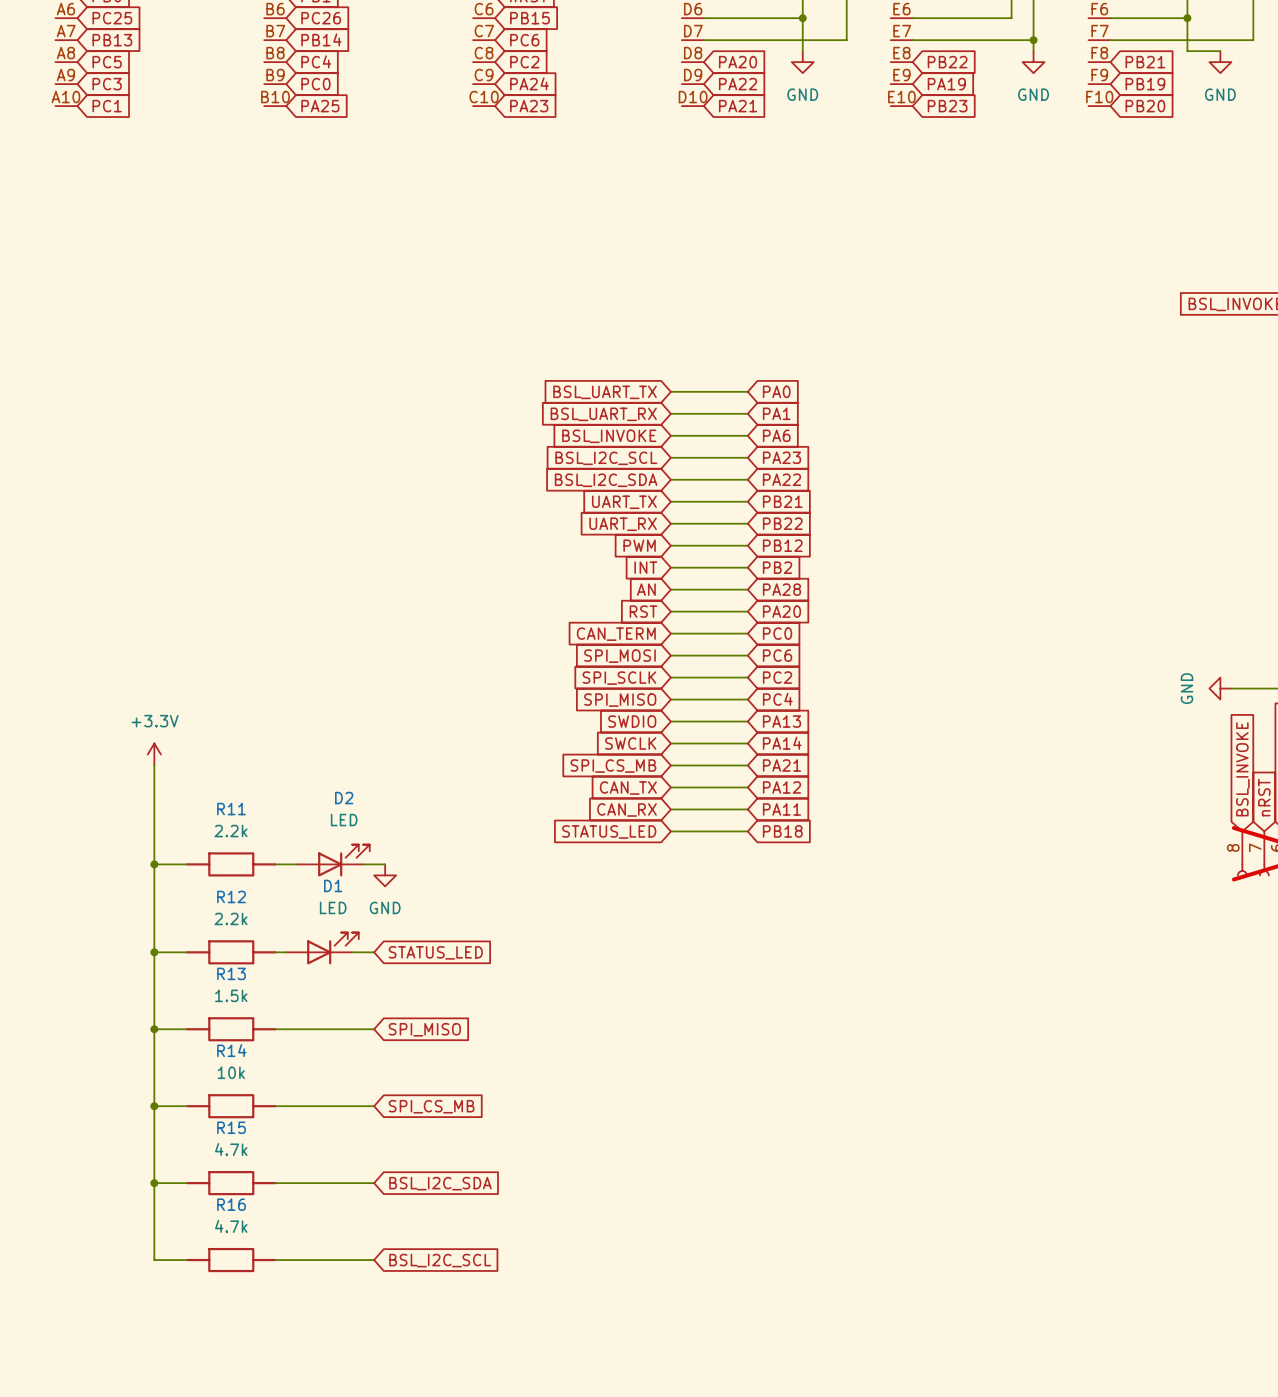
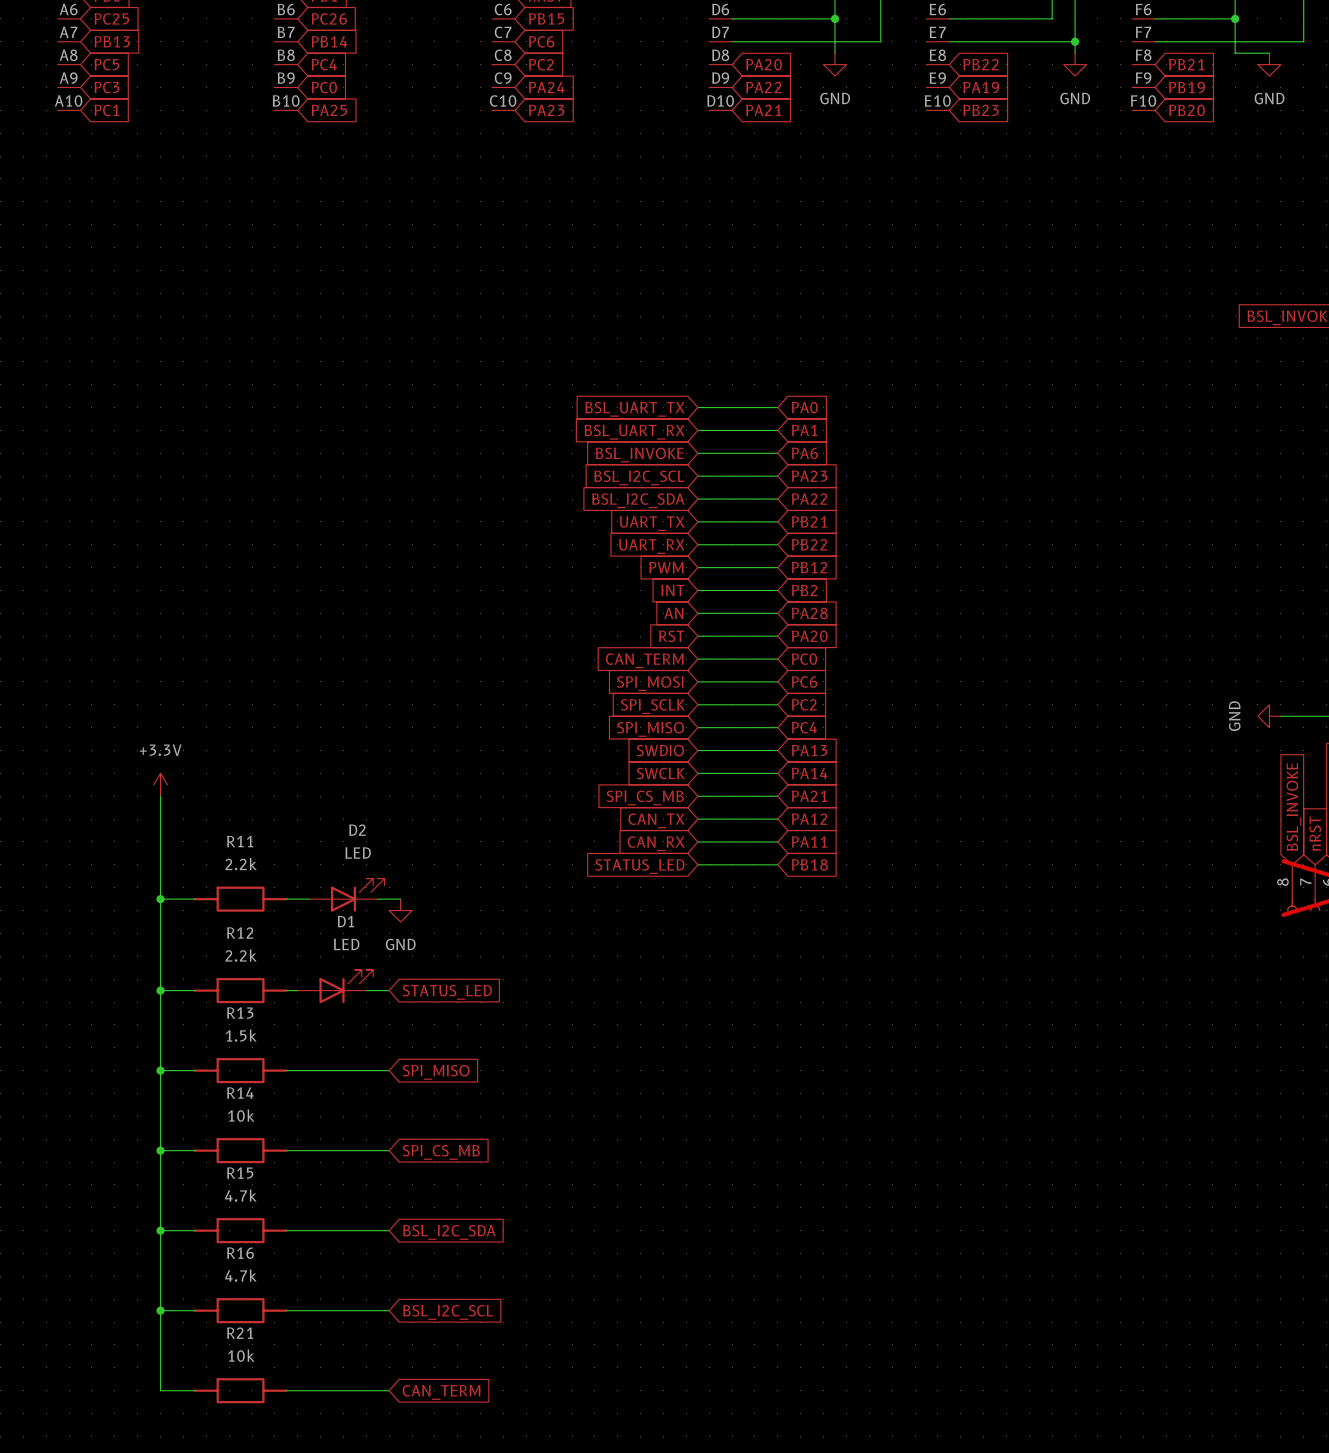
wire: none -> (160, 1310) (160, 1390) (194, 1390)
junction: none -> (160, 1310)
R21: none -> 10k (240, 1390)
wire: none -> (286, 1390) (389, 1390)
global label: none -> CAN_TERM (441, 1392)

